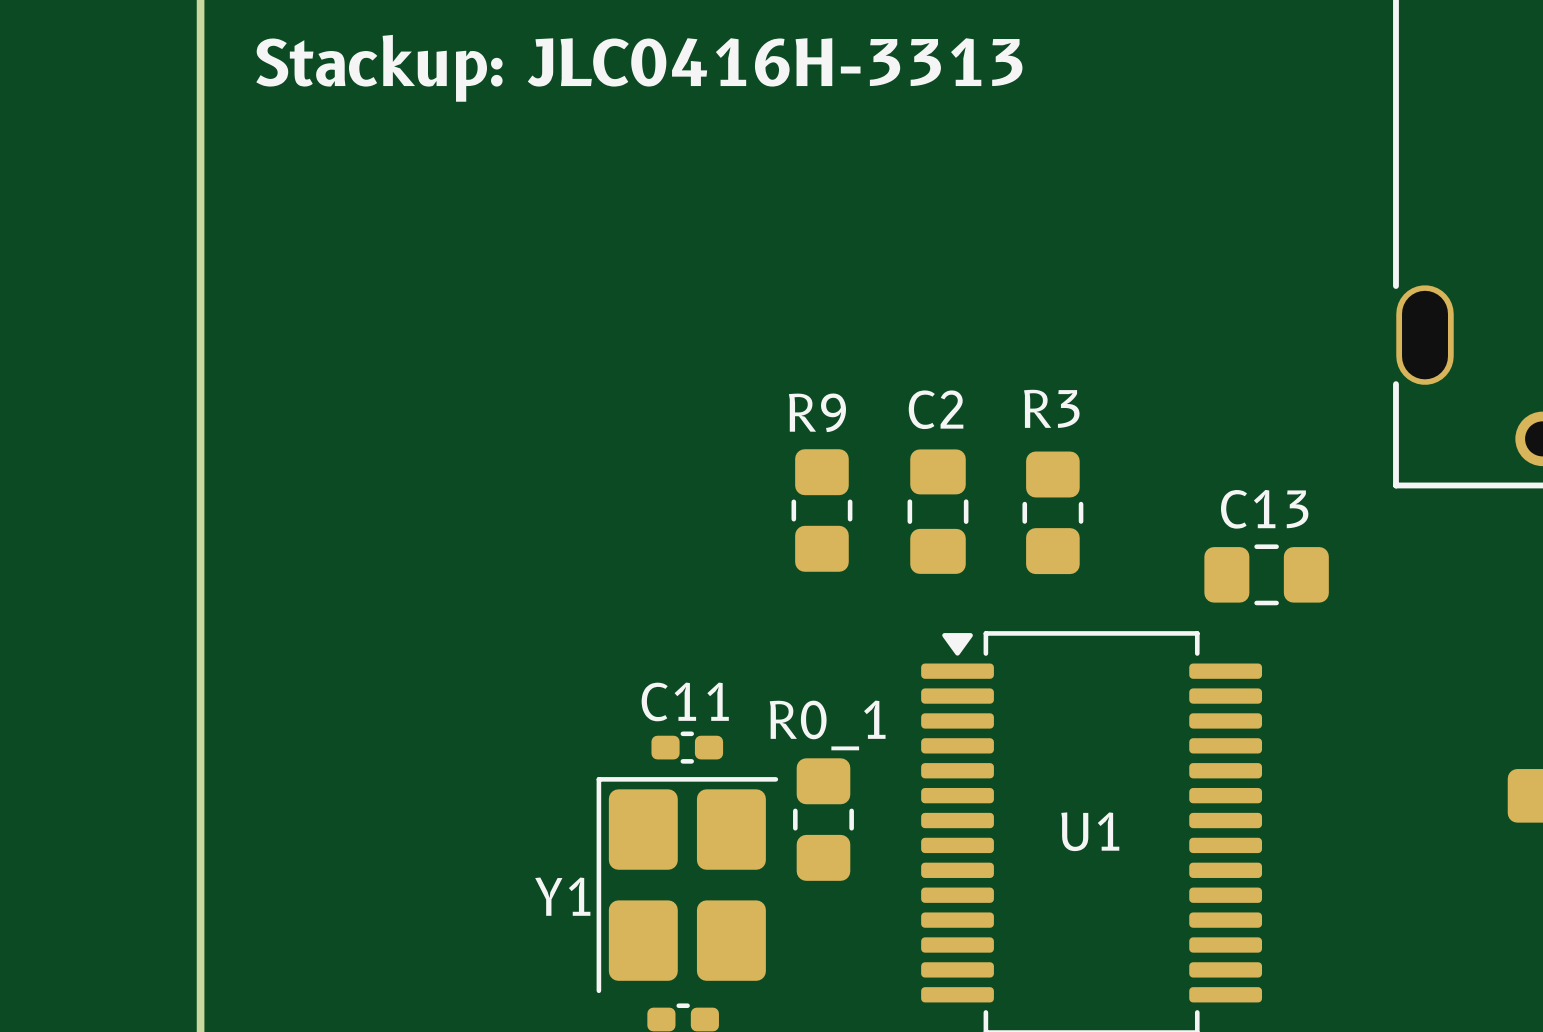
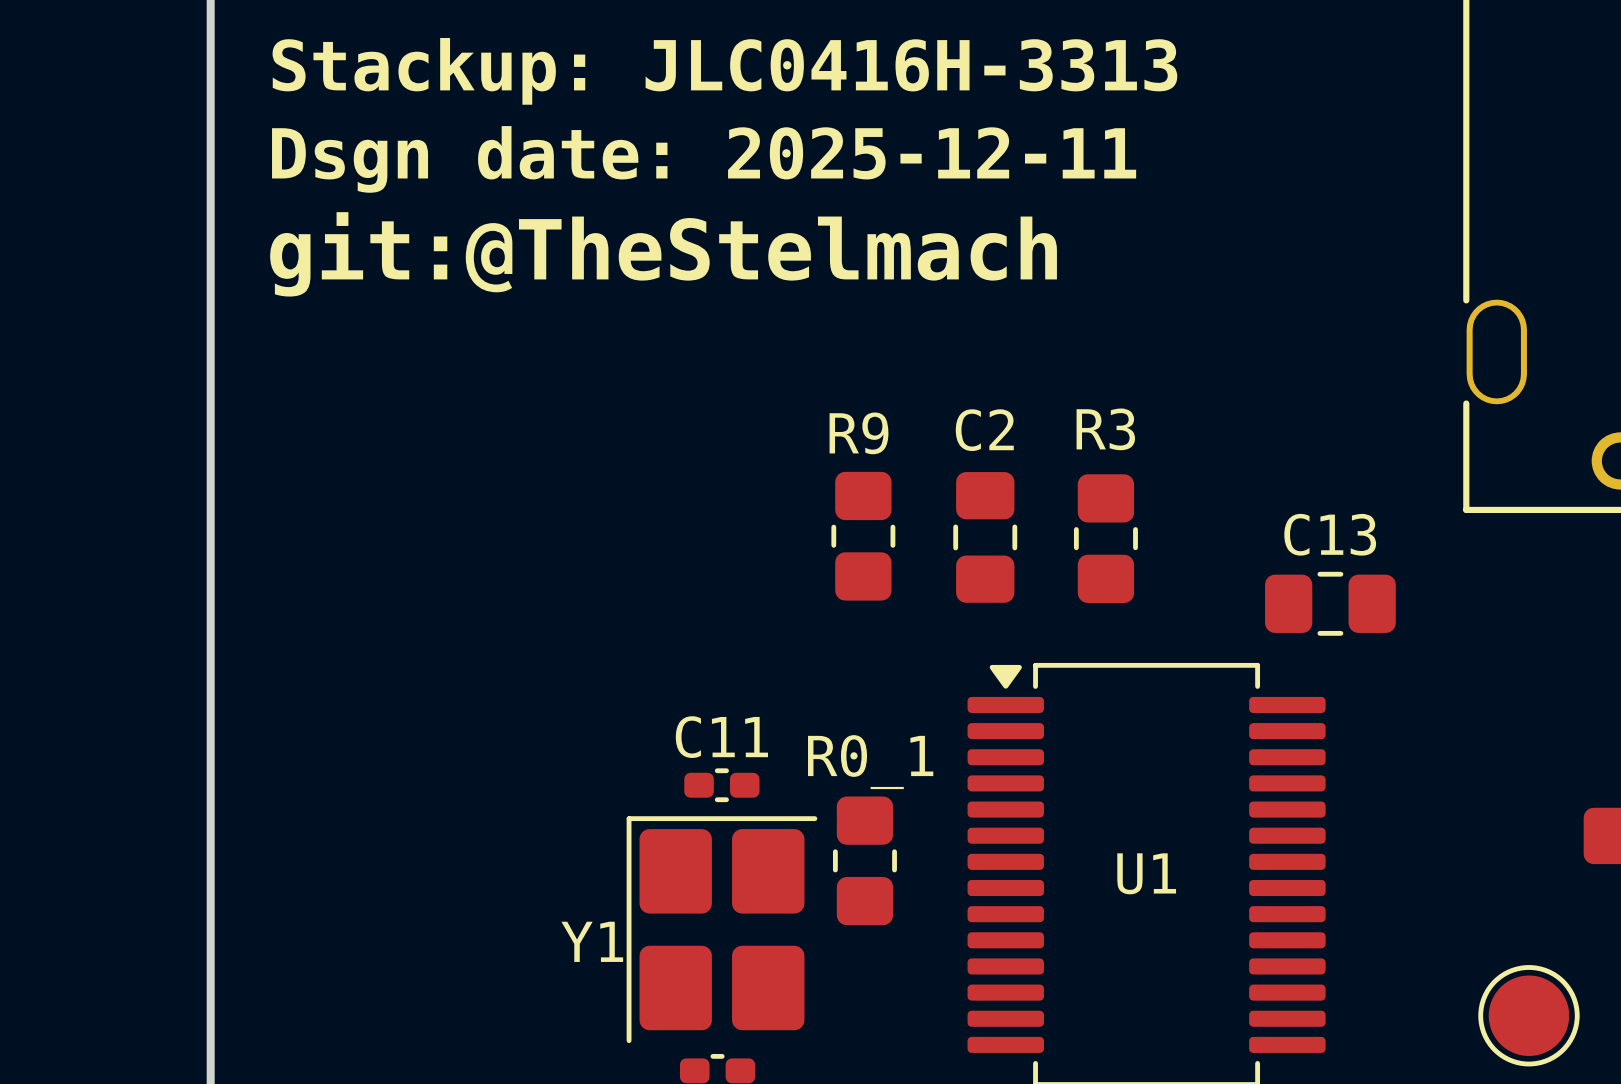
text: none -> Dsgn date: 2025-12-11 (704, 159)
text: none -> git:@TheStelmach (663, 254)
part: none -> (1528, 1015)

